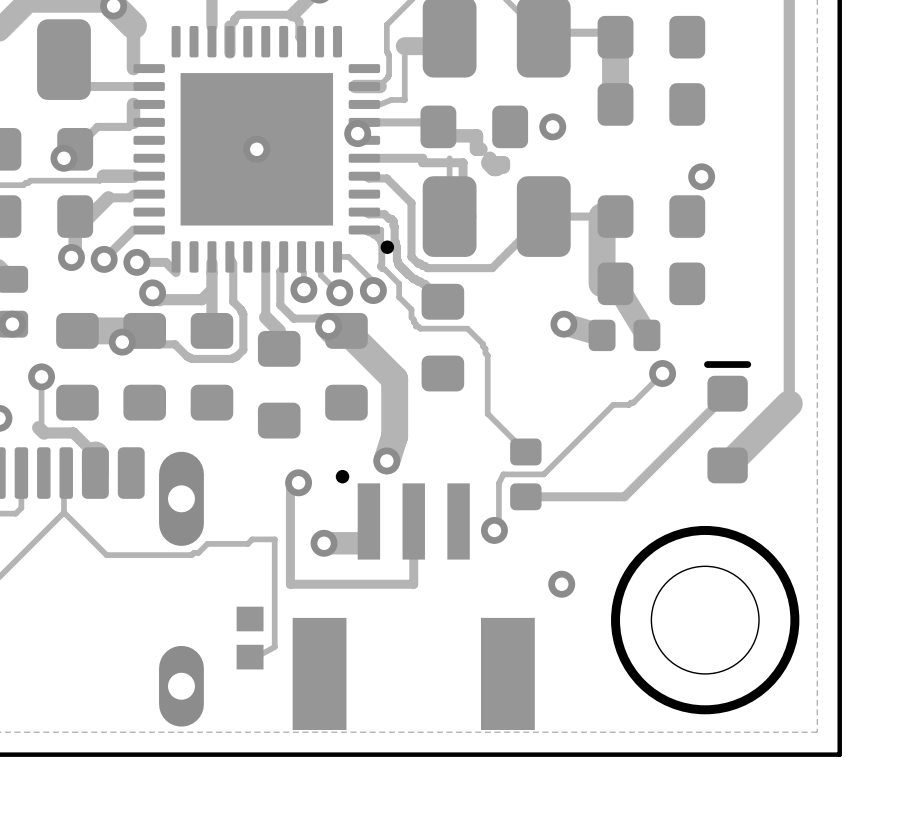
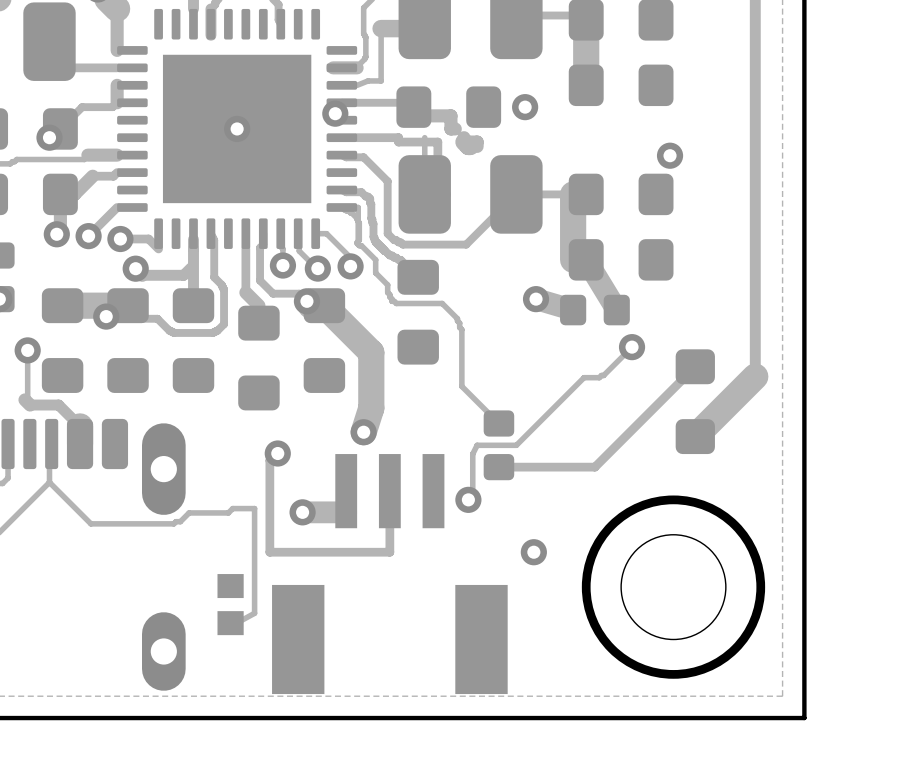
part footprint: [133, 25, 395, 273] -> [117, 8, 358, 249]
part footprint: [704, 361, 752, 484] -> [675, 349, 715, 455]
part footprint: [292, 469, 535, 730] -> [272, 454, 508, 695]

